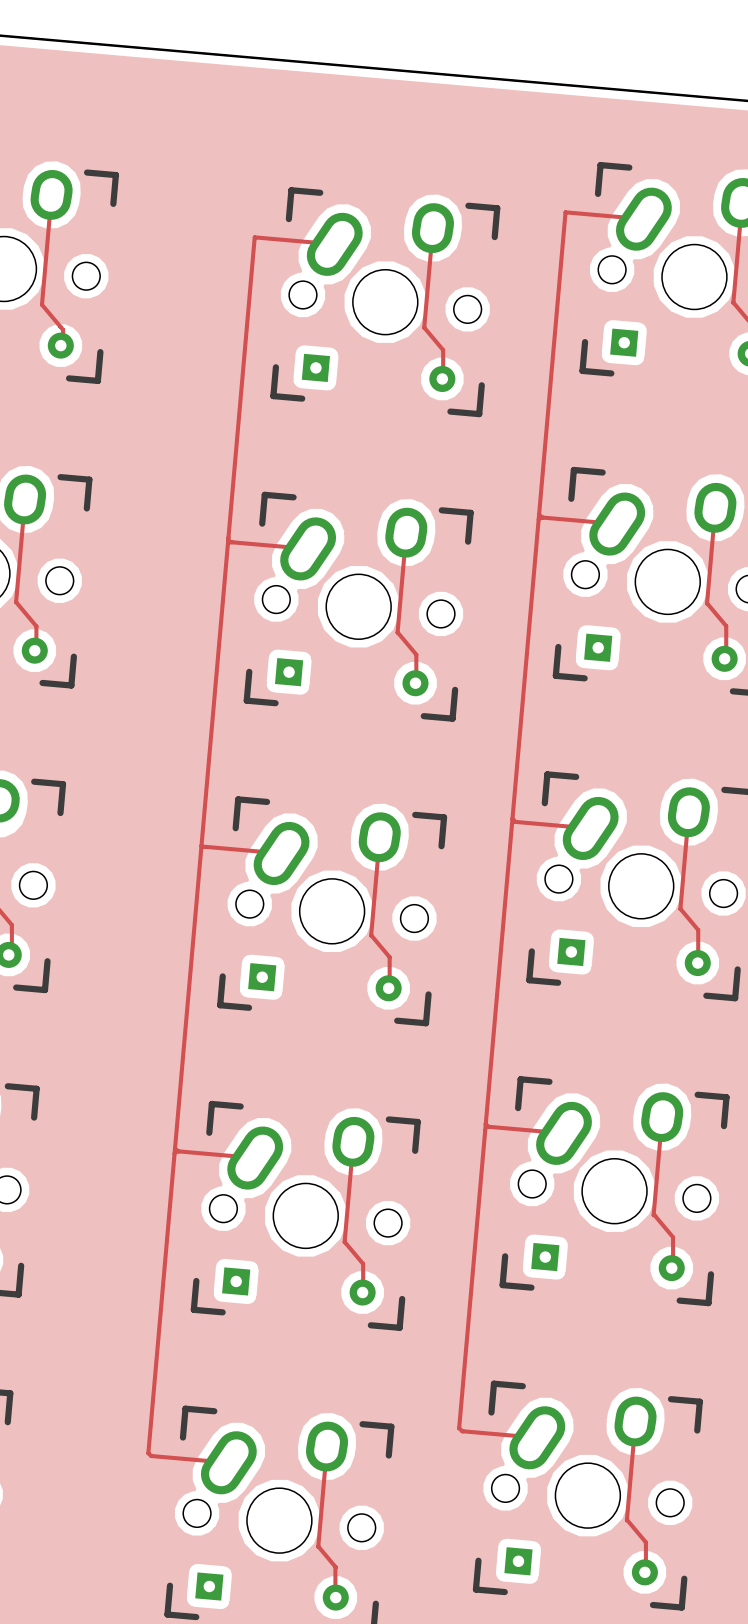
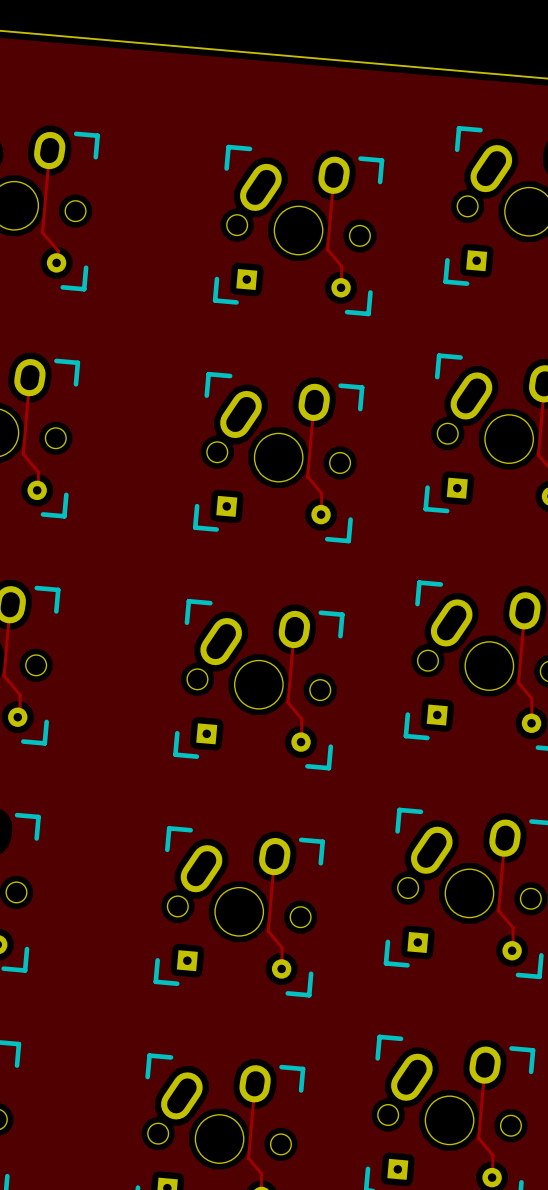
track: (643, 219) (565, 212) (459, 1428) (462, 1431) (537, 1437) -> none
track: (334, 244) (254, 237) (148, 1453) (151, 1456) (228, 1462) -> none
track: (539, 514) (541, 517) (617, 524) -> none
track: (228, 540) (230, 542) (308, 548) -> none
track: (512, 818) (515, 821) (590, 828) -> none
track: (201, 845) (281, 853) -> none
track: (485, 1124) (488, 1126) (564, 1133) -> none
track: (175, 1148) (177, 1151) (255, 1158) -> none

